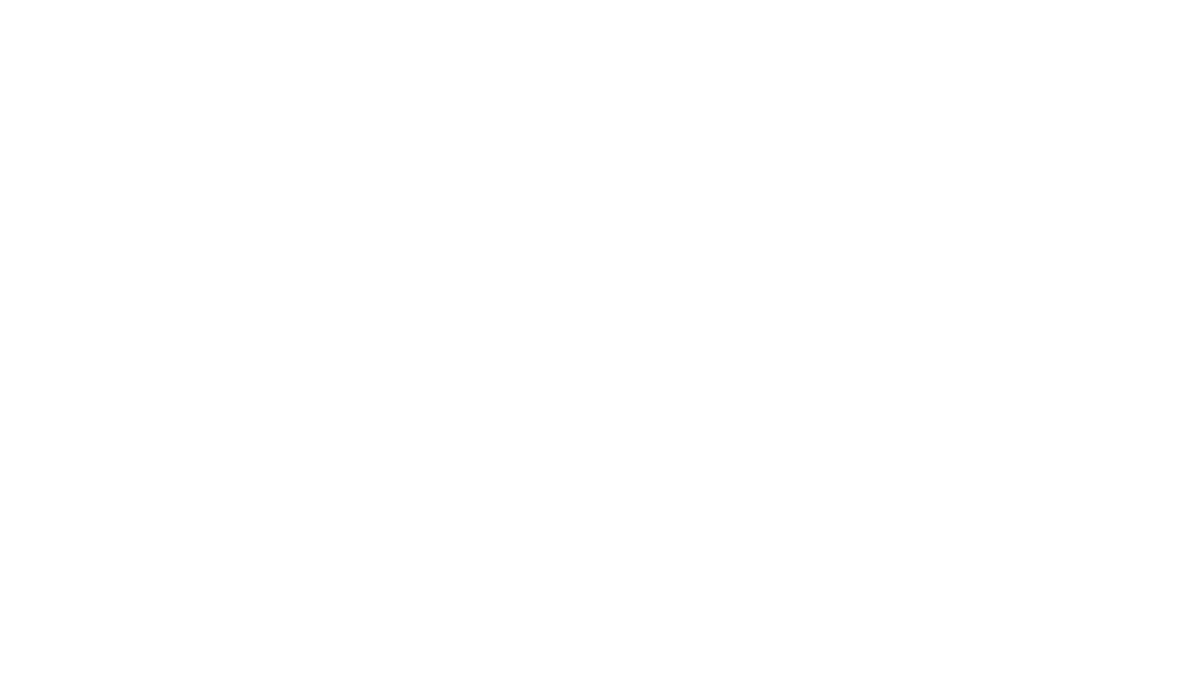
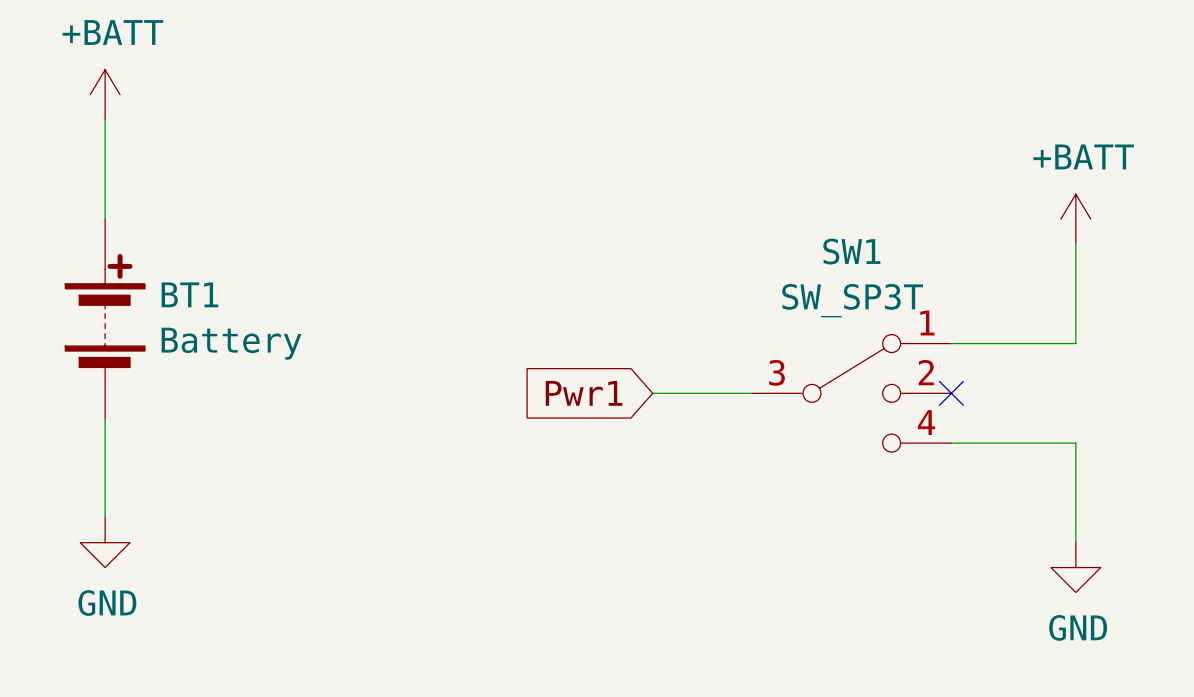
power symbol: none -> +BATT (105, 94)
wire: none -> (105, 119) (105, 219)
power symbol: none -> +BATT (1075, 219)
wire: none -> (1075, 244) (1075, 343) (951, 343)
BT1: none -> Battery (105, 318)
global label: none -> Pwr1 (584, 393)
wire: none -> (652, 393) (752, 393)
SW1: none -> SW_SP3T (851, 393)
no-connect mark: none -> (951, 393)
wire: none -> (105, 418) (105, 517)
wire: none -> (951, 443) (1075, 443) (1075, 542)
power symbol: none -> GND (105, 542)
power symbol: none -> GND (1075, 567)

